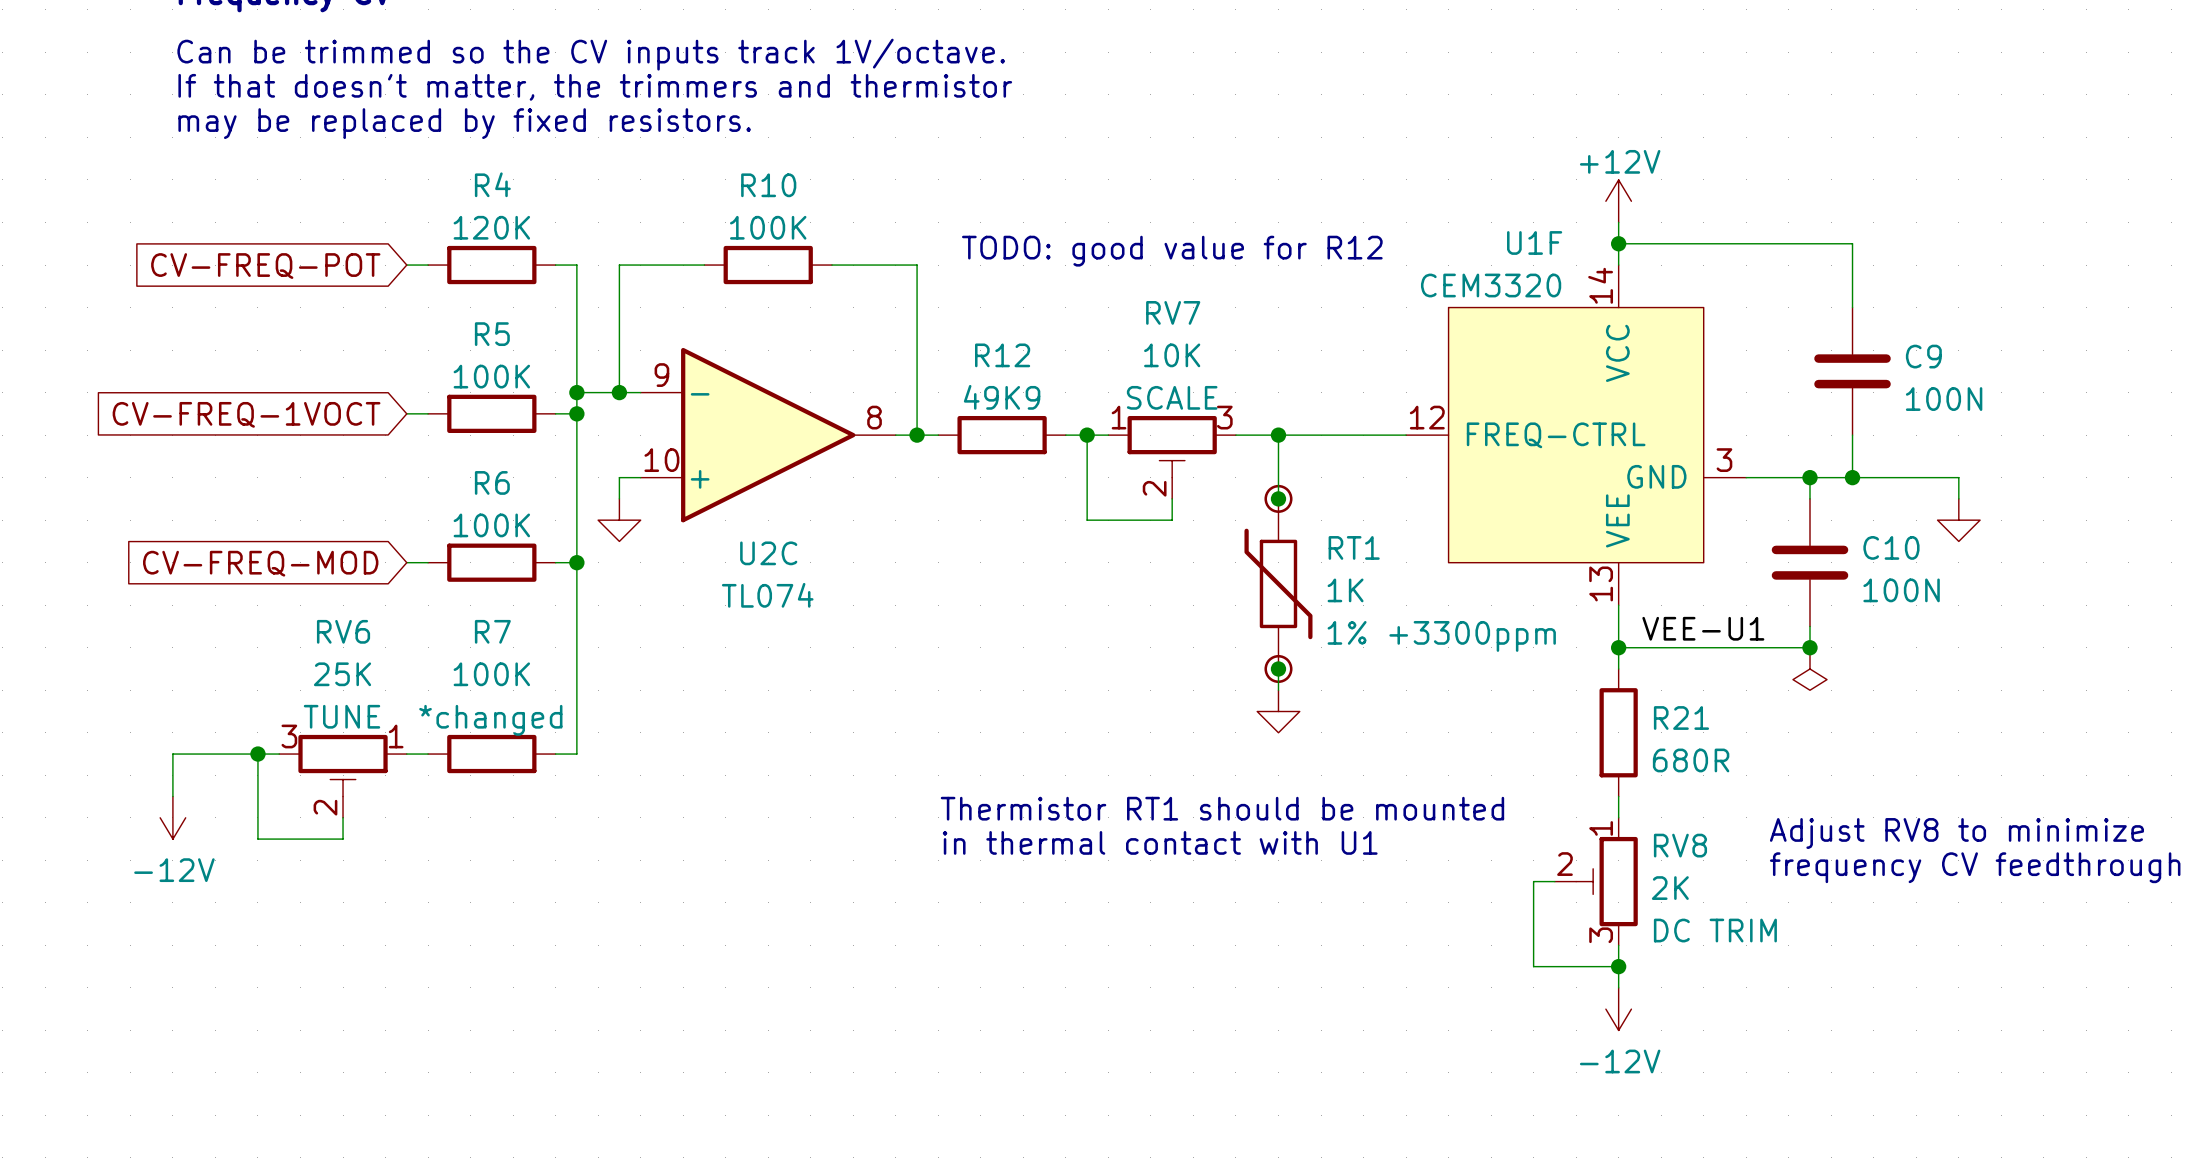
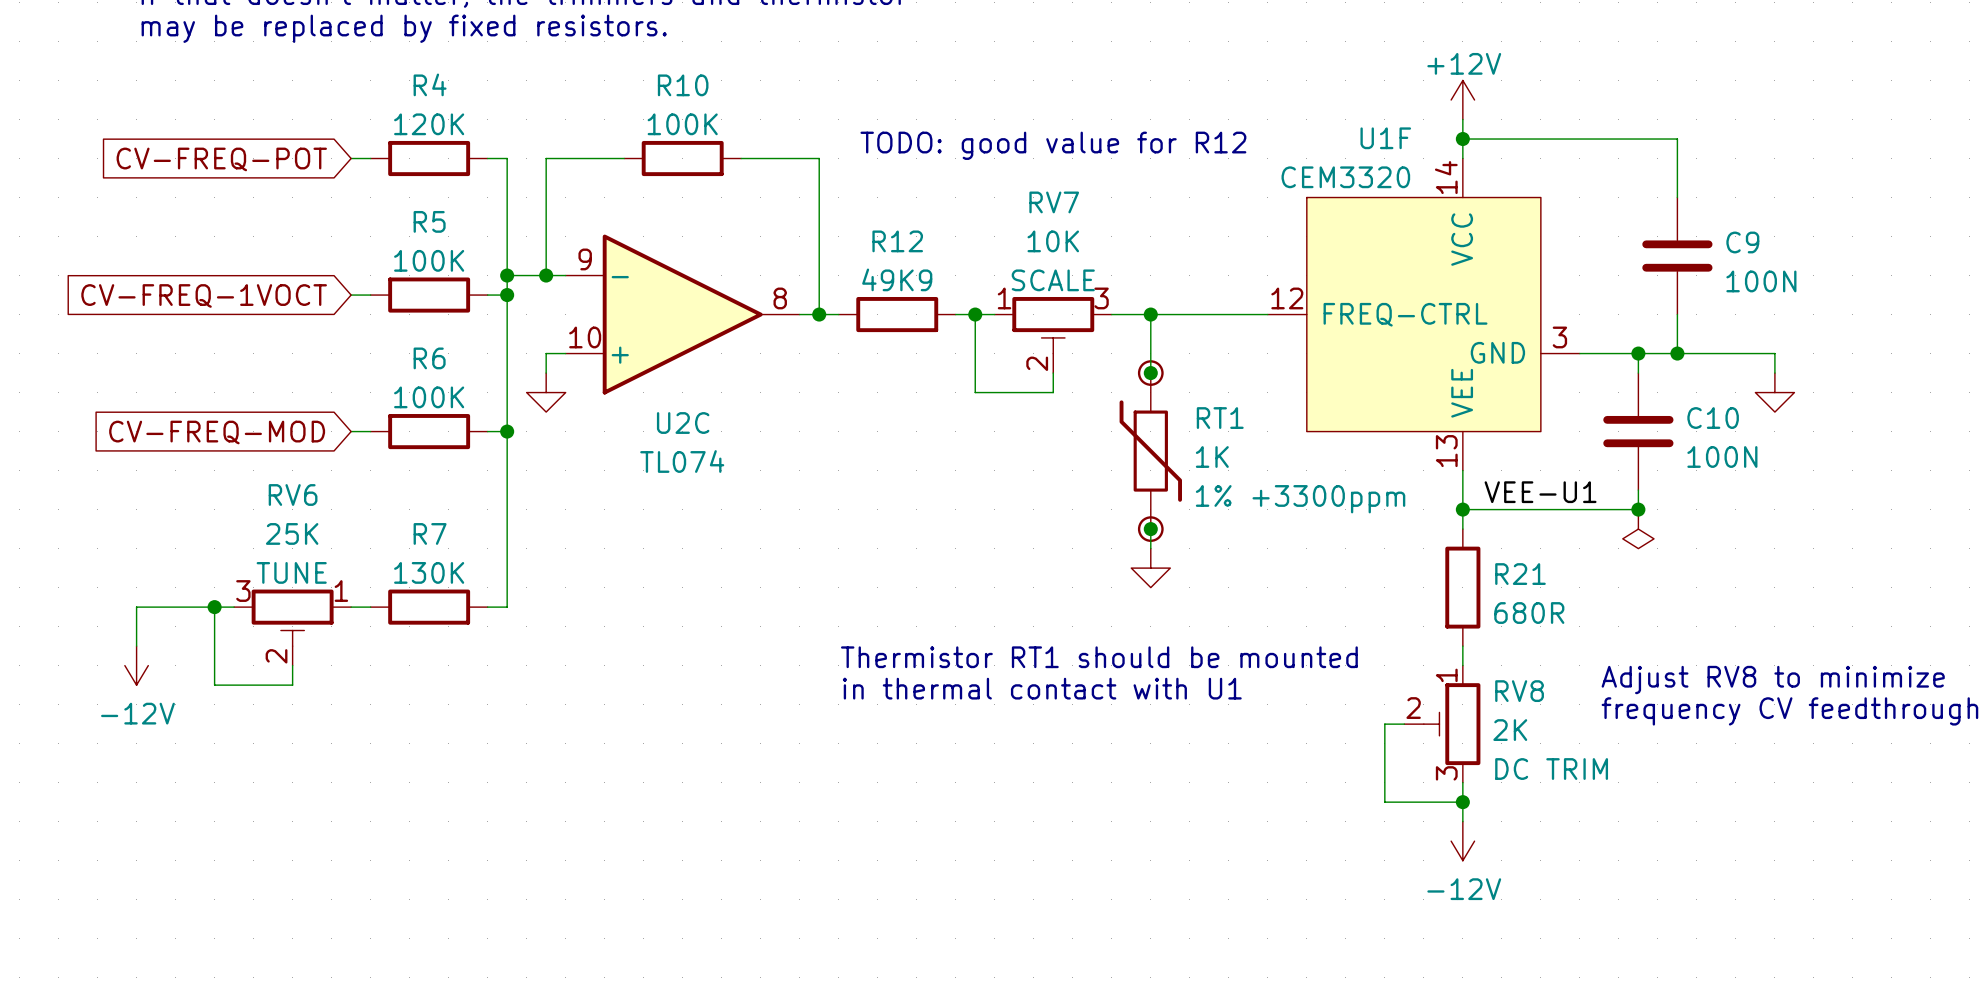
R7 name position: R7 (492, 631) -> R7 (430, 533)
R7 value: 100K (491, 674) -> 130K (429, 572)
R7 text: *changed (490, 720) -> none

